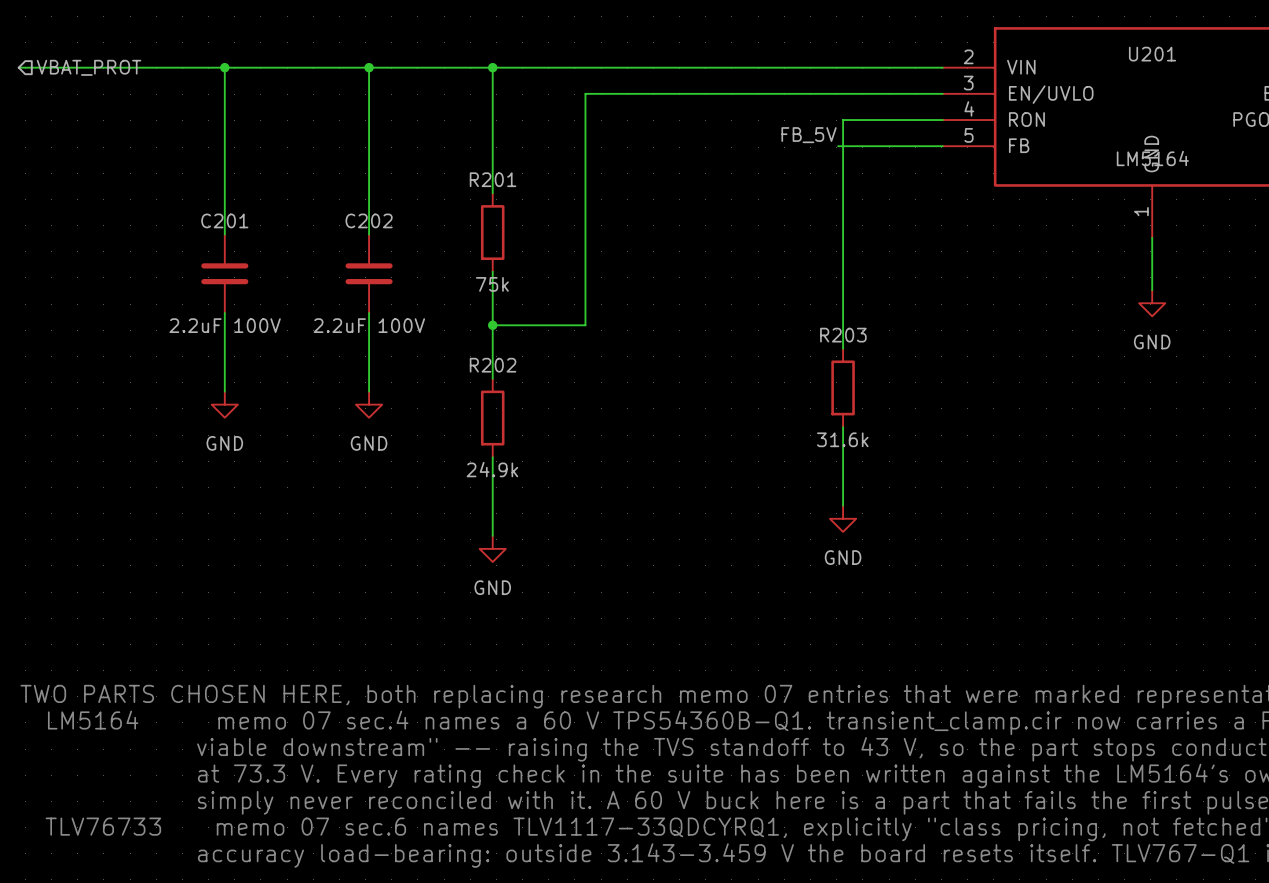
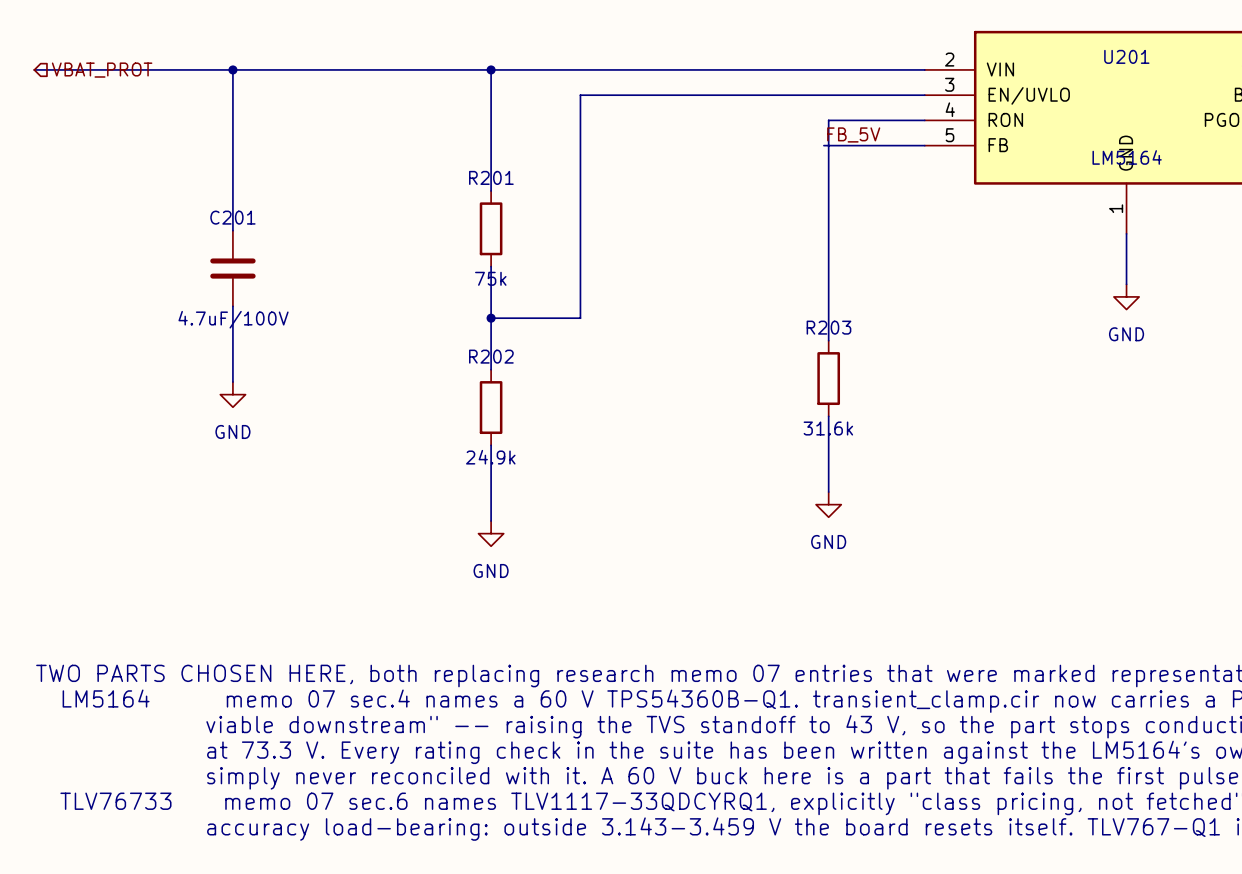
wire: (369, 67) (369, 234) -> none
junction: (369, 67) -> none
label position: FB_5V (809, 135) -> FB_5V (853, 134)
C202: 2.2uF 100V (369, 273) -> none
wire: (369, 313) (369, 391) -> none
C201 value: 2.2uF 100V (225, 325) -> 4.7uF/100V (233, 319)
power symbol: GND (369, 404) -> none

